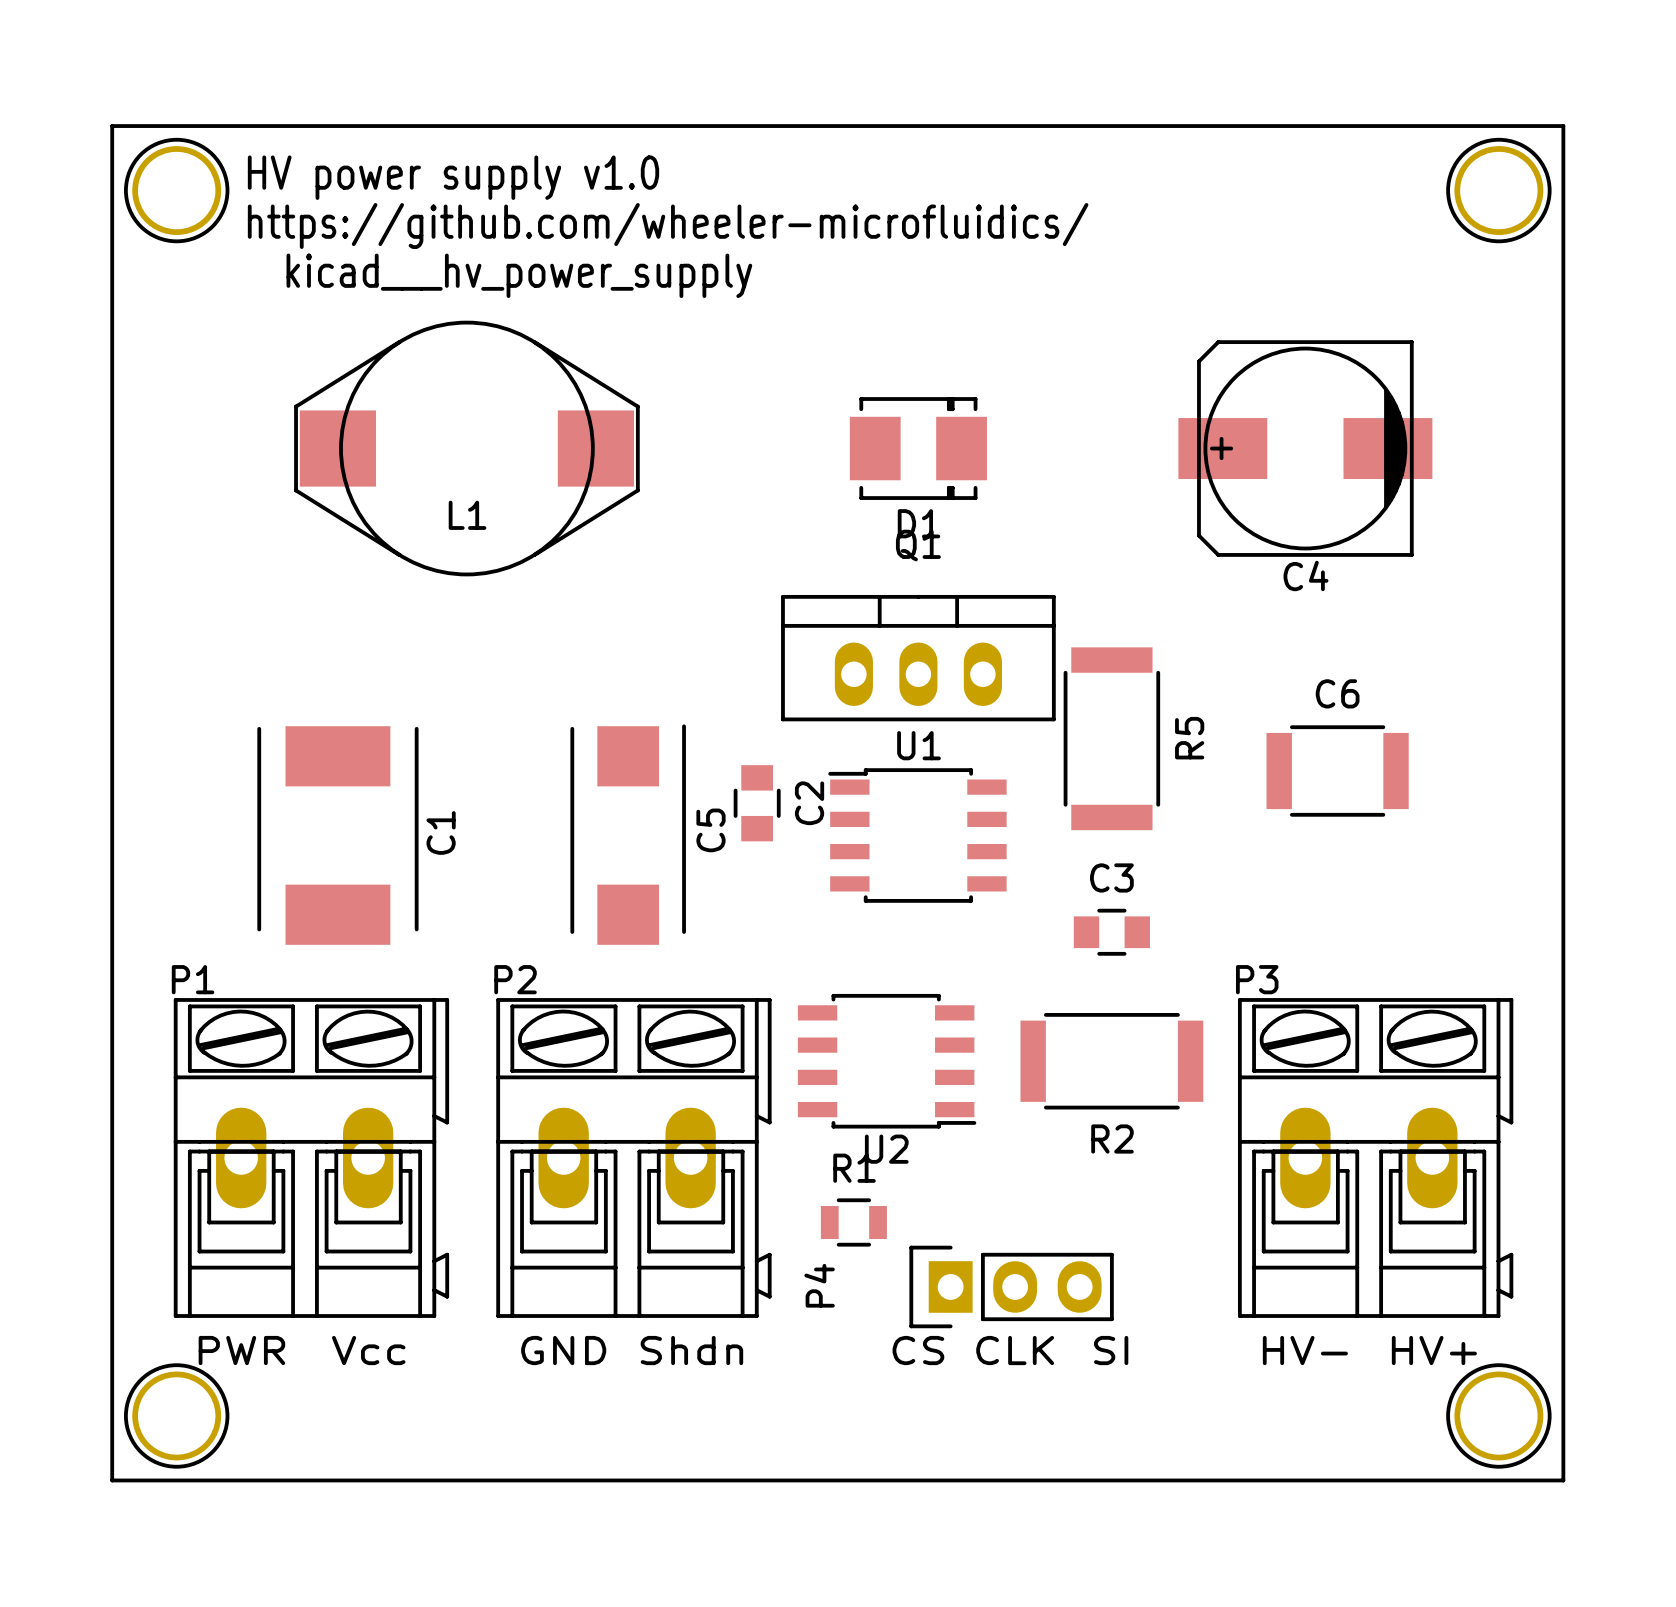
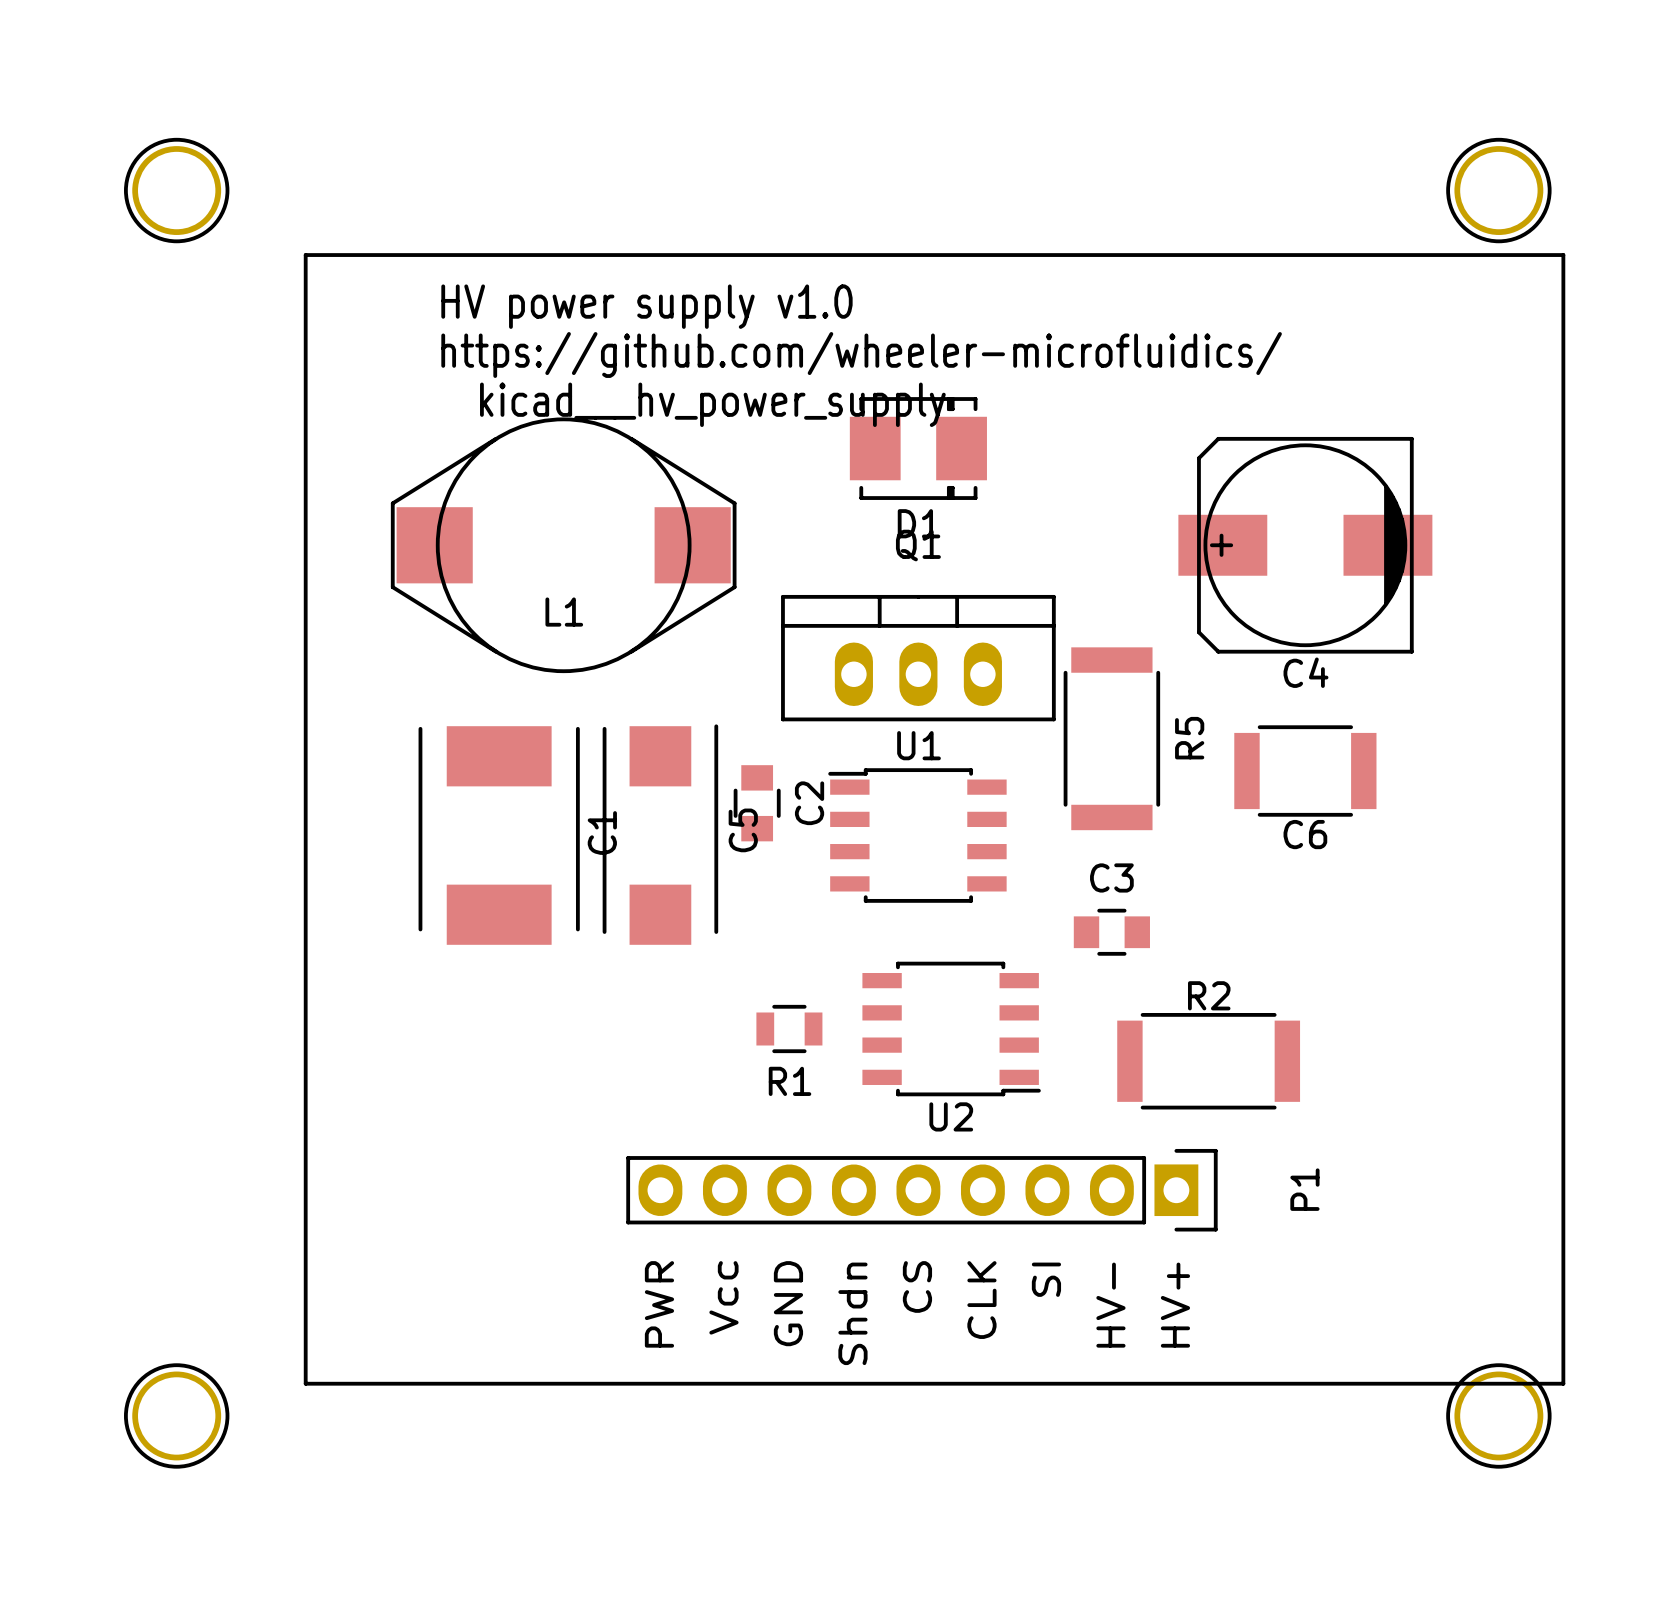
text position: HV power supply v1.0 (453, 177) -> HV power supply v1.0 (646, 306)
text position: https://github.com/wheeler-microfluidics/ (668, 226) -> https://github.com/wheeler-microfluidics/ (861, 354)
board edge: (1563, 255) (1563, 126) (112, 126) (112, 1480) (1563, 1480) (1563, 1383) -> (1563, 255) (305, 255) (305, 1383) (1563, 1383)
text position: kicad___hv_power_supply (519, 275) -> kicad___hv_power_supply (712, 404)
L1 position: (466, 448) -> (563, 545)
C4 position: (1305, 448) -> (1305, 545)
C6 name position: C6 (1337, 693) -> C6 (1305, 834)
C6 position: (1337, 771) -> (1305, 771)
C5 position: (628, 834) -> (660, 834)
C1 position: (337, 835) -> (499, 835)
P1 name position: P1 (193, 979) -> P1 (1304, 1189)
P1 footprint: [173, 998, 450, 1318] -> [626, 1148, 1218, 1232]
U2 position: (887, 1061) -> (951, 1028)
R2 position: (1111, 1061) -> (1208, 1061)
R2 name position: R2 (1112, 1139) -> R2 (1209, 995)
P2: (633, 1157) -> none
P3: (1375, 1157) -> none
R1 name position: R1 (854, 1168) -> R1 (790, 1081)
R1 position: (853, 1222) -> (789, 1028)
P4: (1011, 1286) -> none
text rotation: 0° (241, 1350) -> 90° counterclockwise (659, 1304)
text position: PWR (241, 1350) -> PWR (659, 1304)
text rotation: 0° (368, 1350) -> 90° counterclockwise (723, 1297)
text position: Vcc (368, 1350) -> Vcc (723, 1297)
text rotation: 0° (563, 1350) -> 90° counterclockwise (788, 1303)
text position: GND (563, 1350) -> GND (788, 1303)
text rotation: 0° (691, 1350) -> 90° counterclockwise (852, 1313)
text position: Shdn (691, 1350) -> Shdn (852, 1313)
text rotation: 0° (918, 1350) -> 90° counterclockwise (917, 1286)
text rotation: 0° (1015, 1350) -> 90° counterclockwise (981, 1300)
text rotation: 0° (1111, 1350) -> 90° counterclockwise (1046, 1279)
text position: SI (1111, 1350) -> SI (1046, 1279)
text rotation: 0° (1305, 1350) -> 90° counterclockwise (1110, 1305)
text position: HV- (1305, 1350) -> HV- (1110, 1305)
text rotation: 0° (1434, 1350) -> 90° counterclockwise (1175, 1305)
text position: HV+ (1434, 1350) -> HV+ (1175, 1305)

